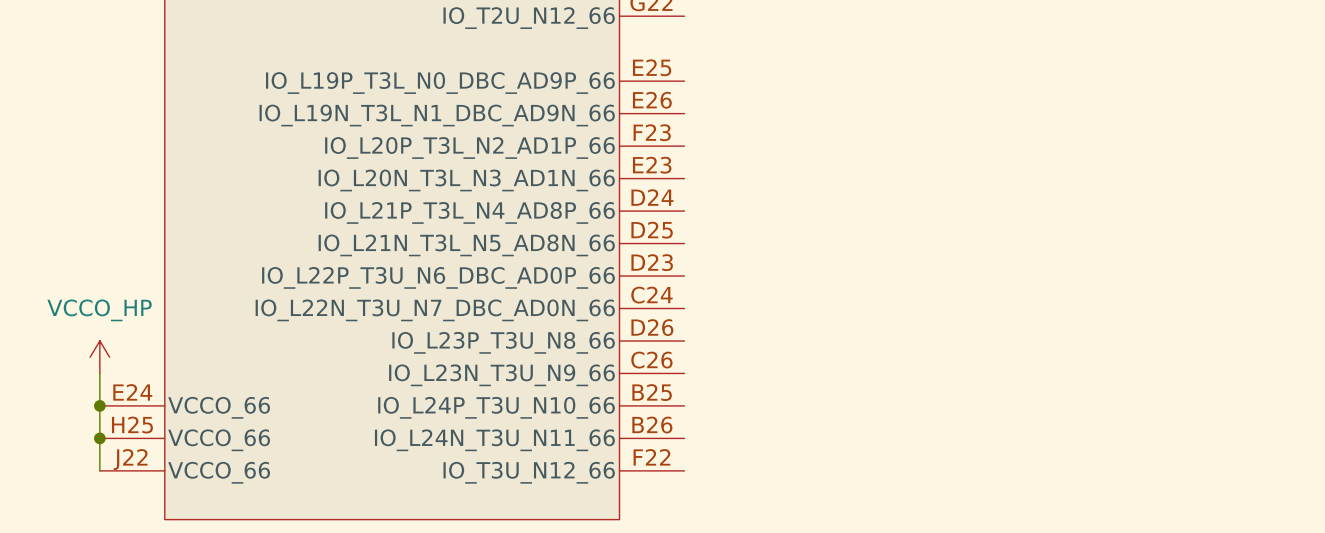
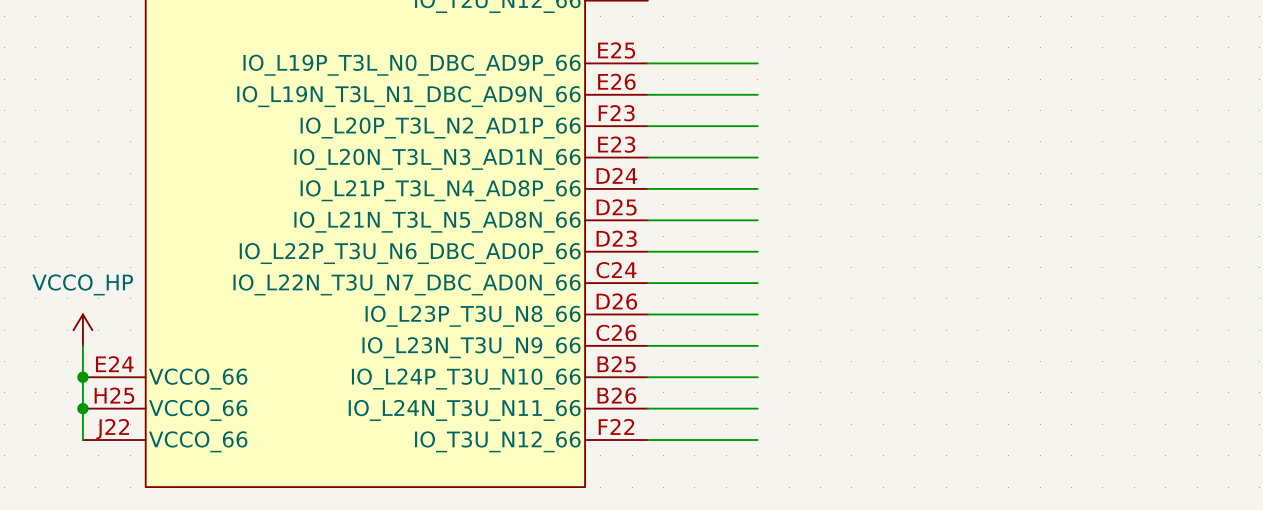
wire: none -> (647, 63) (757, 63)
wire: none -> (647, 94) (757, 94)
wire: none -> (647, 126) (757, 126)
wire: none -> (647, 157) (757, 157)
wire: none -> (647, 188) (757, 188)
wire: none -> (647, 220) (757, 220)
wire: none -> (647, 251) (757, 251)
wire: none -> (647, 283) (757, 283)
wire: none -> (647, 314) (757, 314)
wire: none -> (647, 345) (757, 345)
wire: none -> (647, 377) (757, 377)
wire: none -> (647, 408) (757, 408)
wire: none -> (647, 440) (757, 440)

